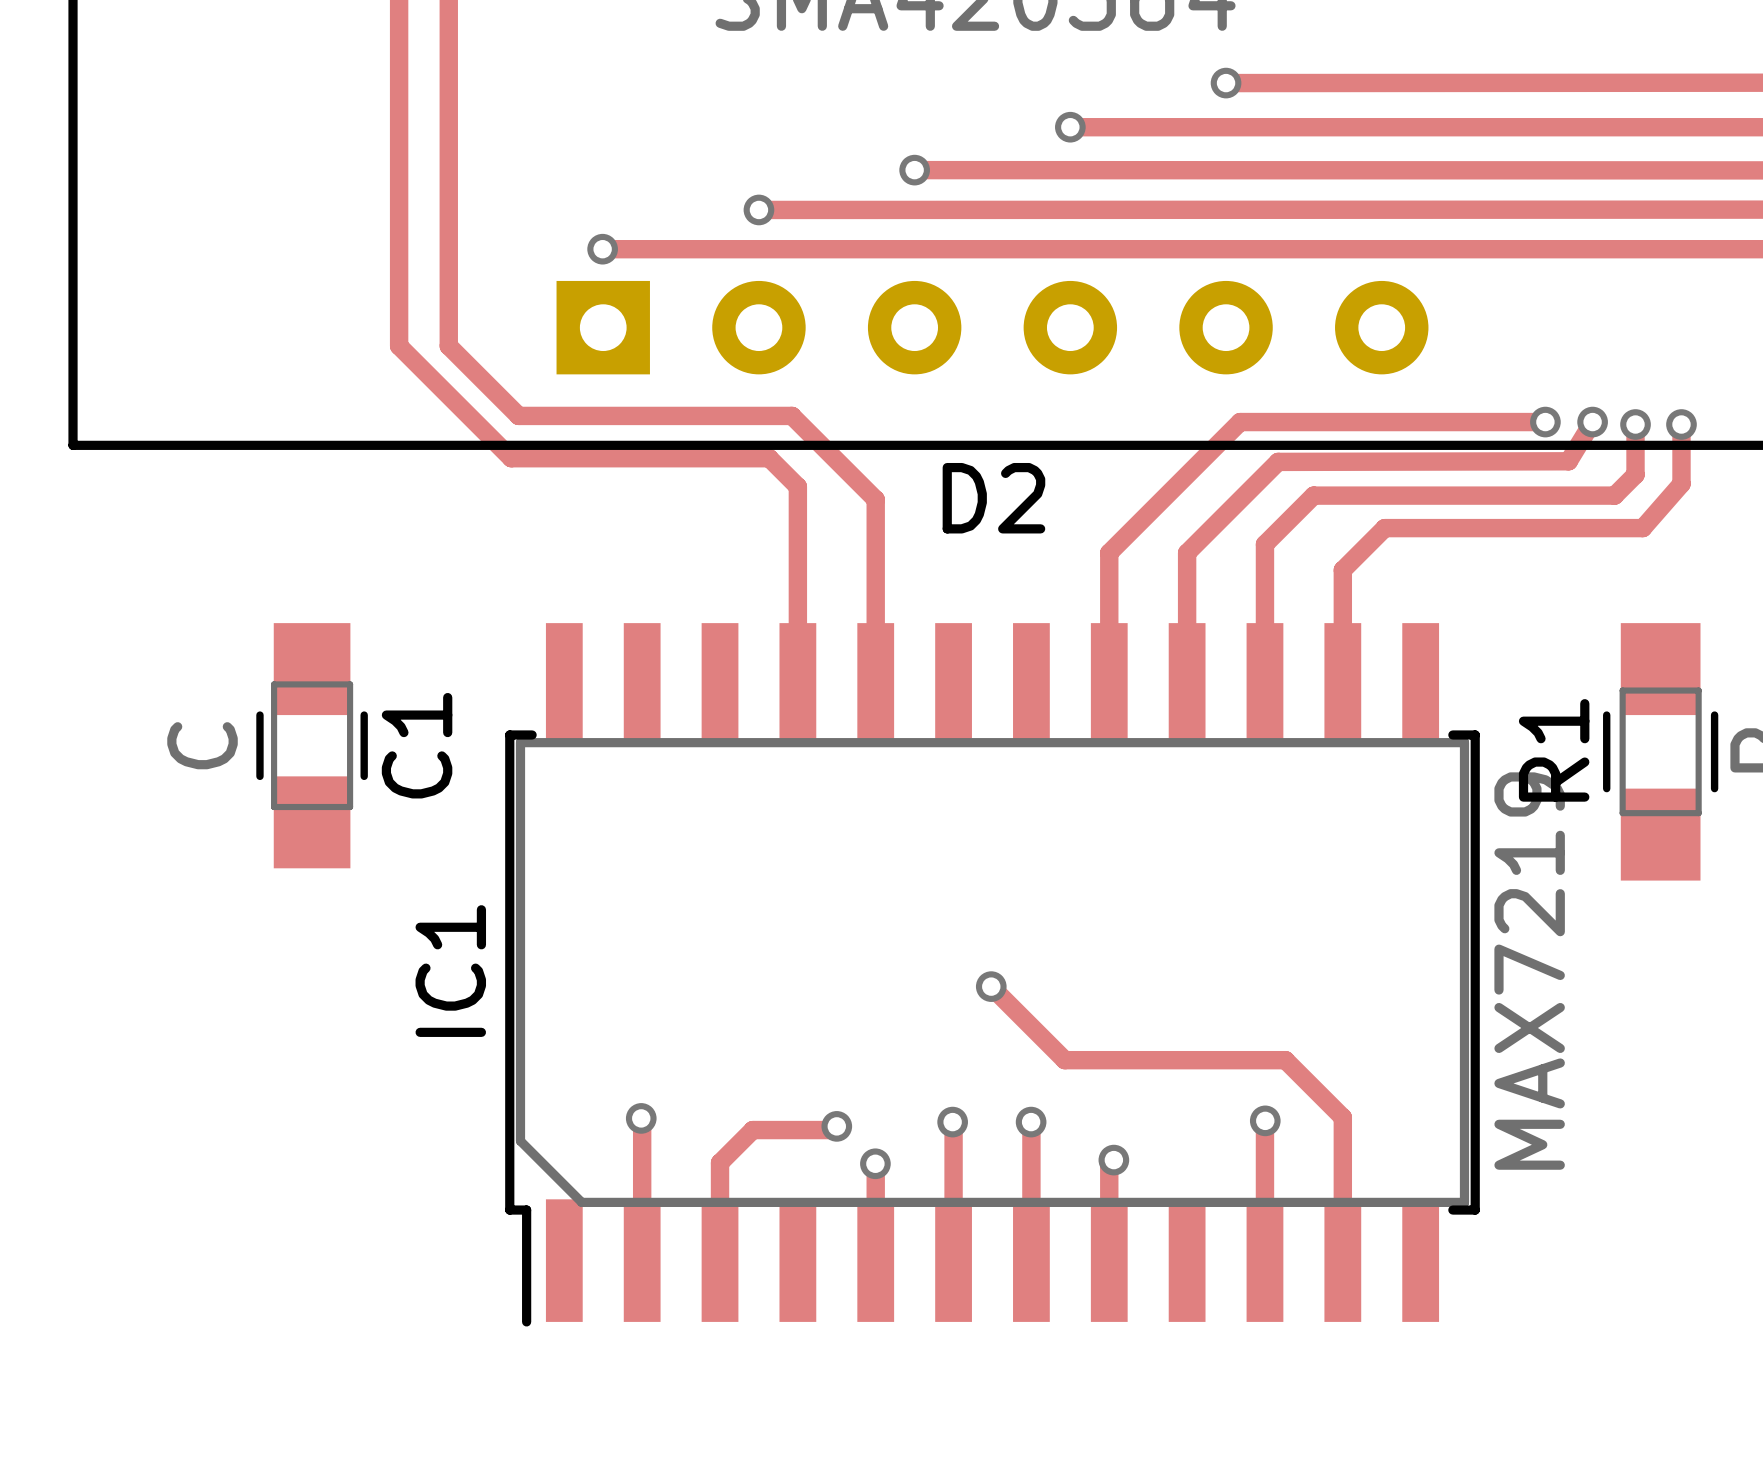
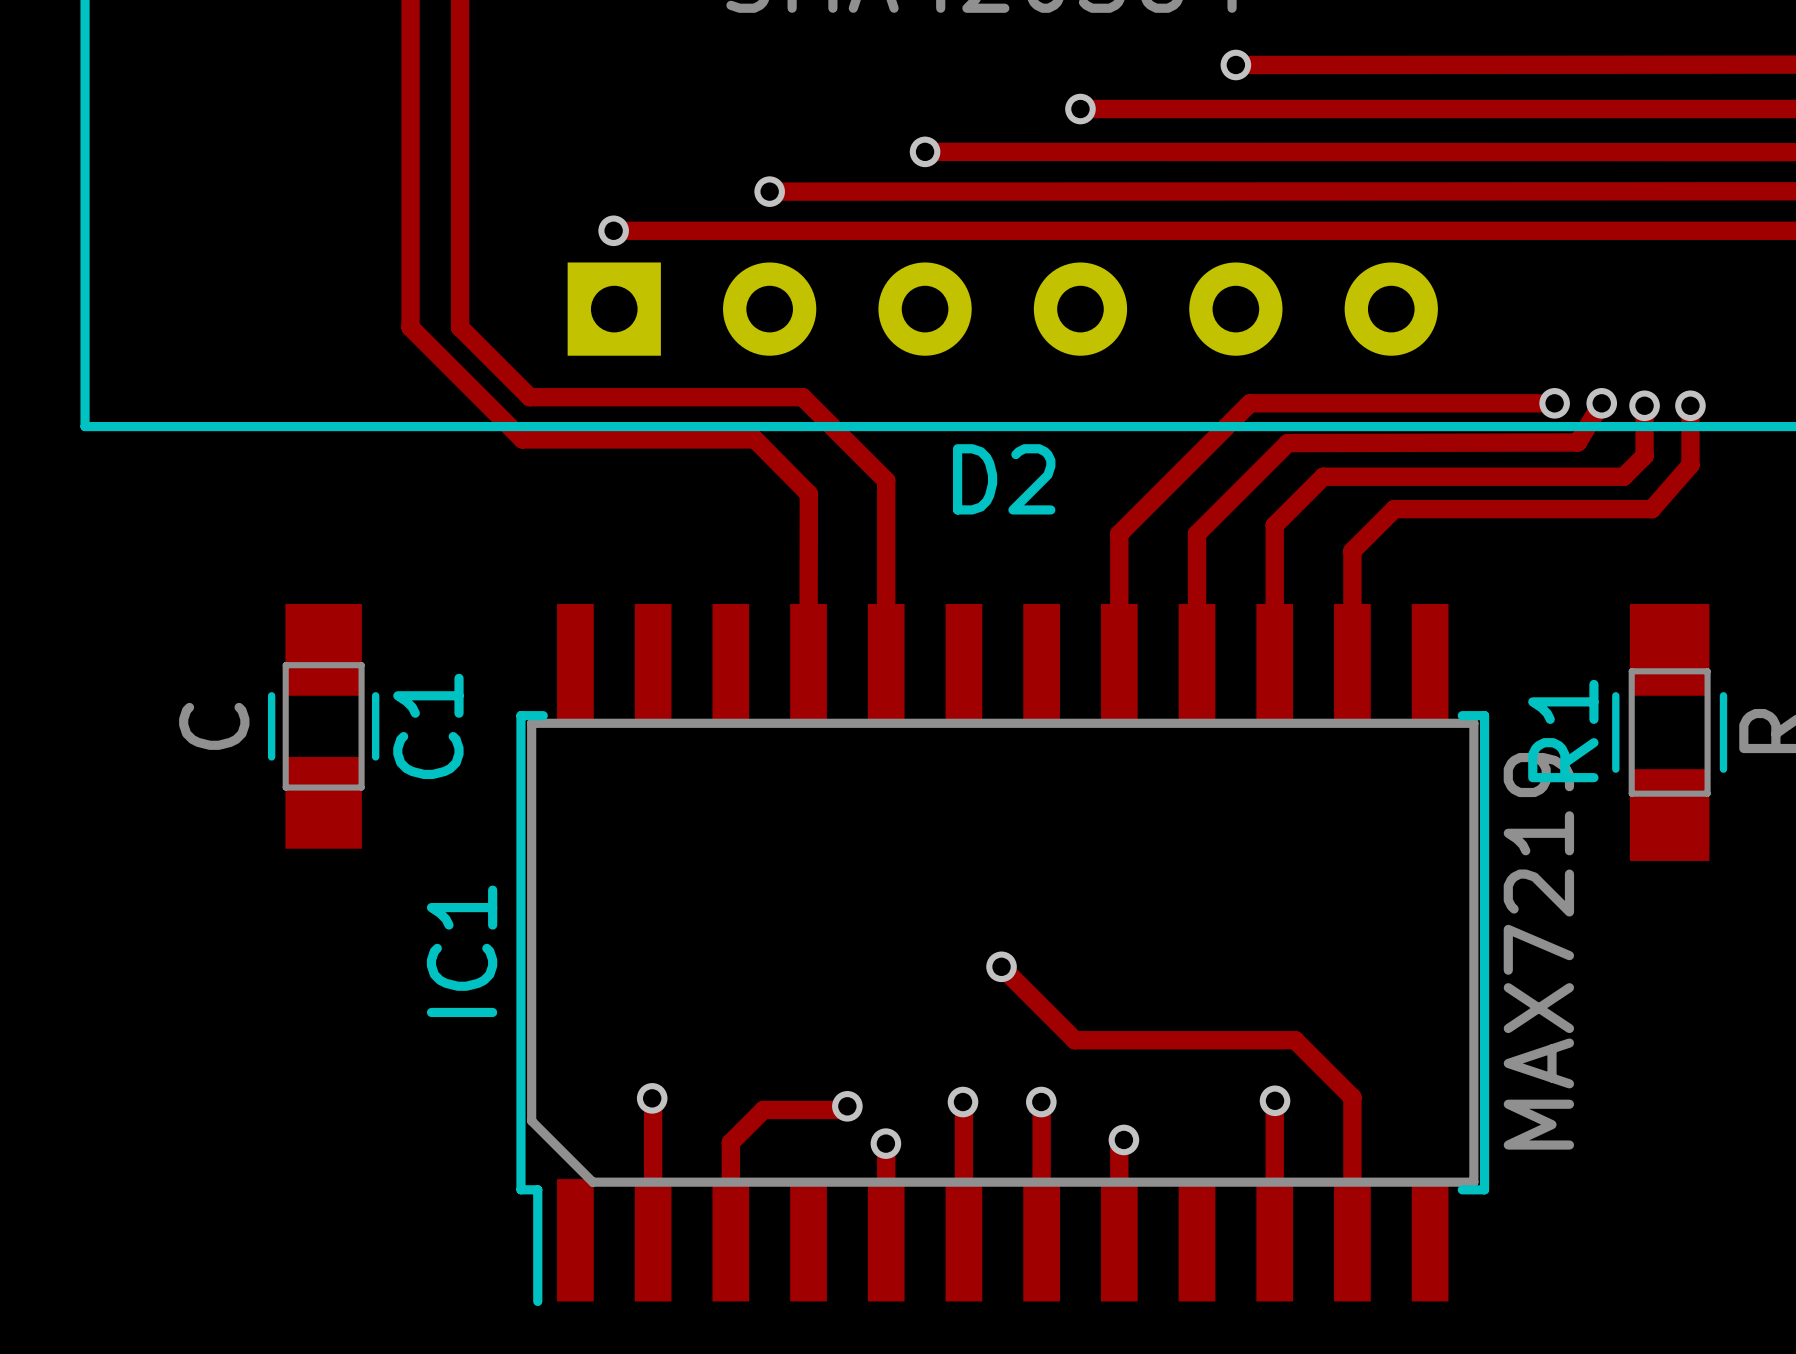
track: (744, 458) (769, 458) (797, 486) (797, 684) -> (754, 439) (808, 493) (808, 665)

